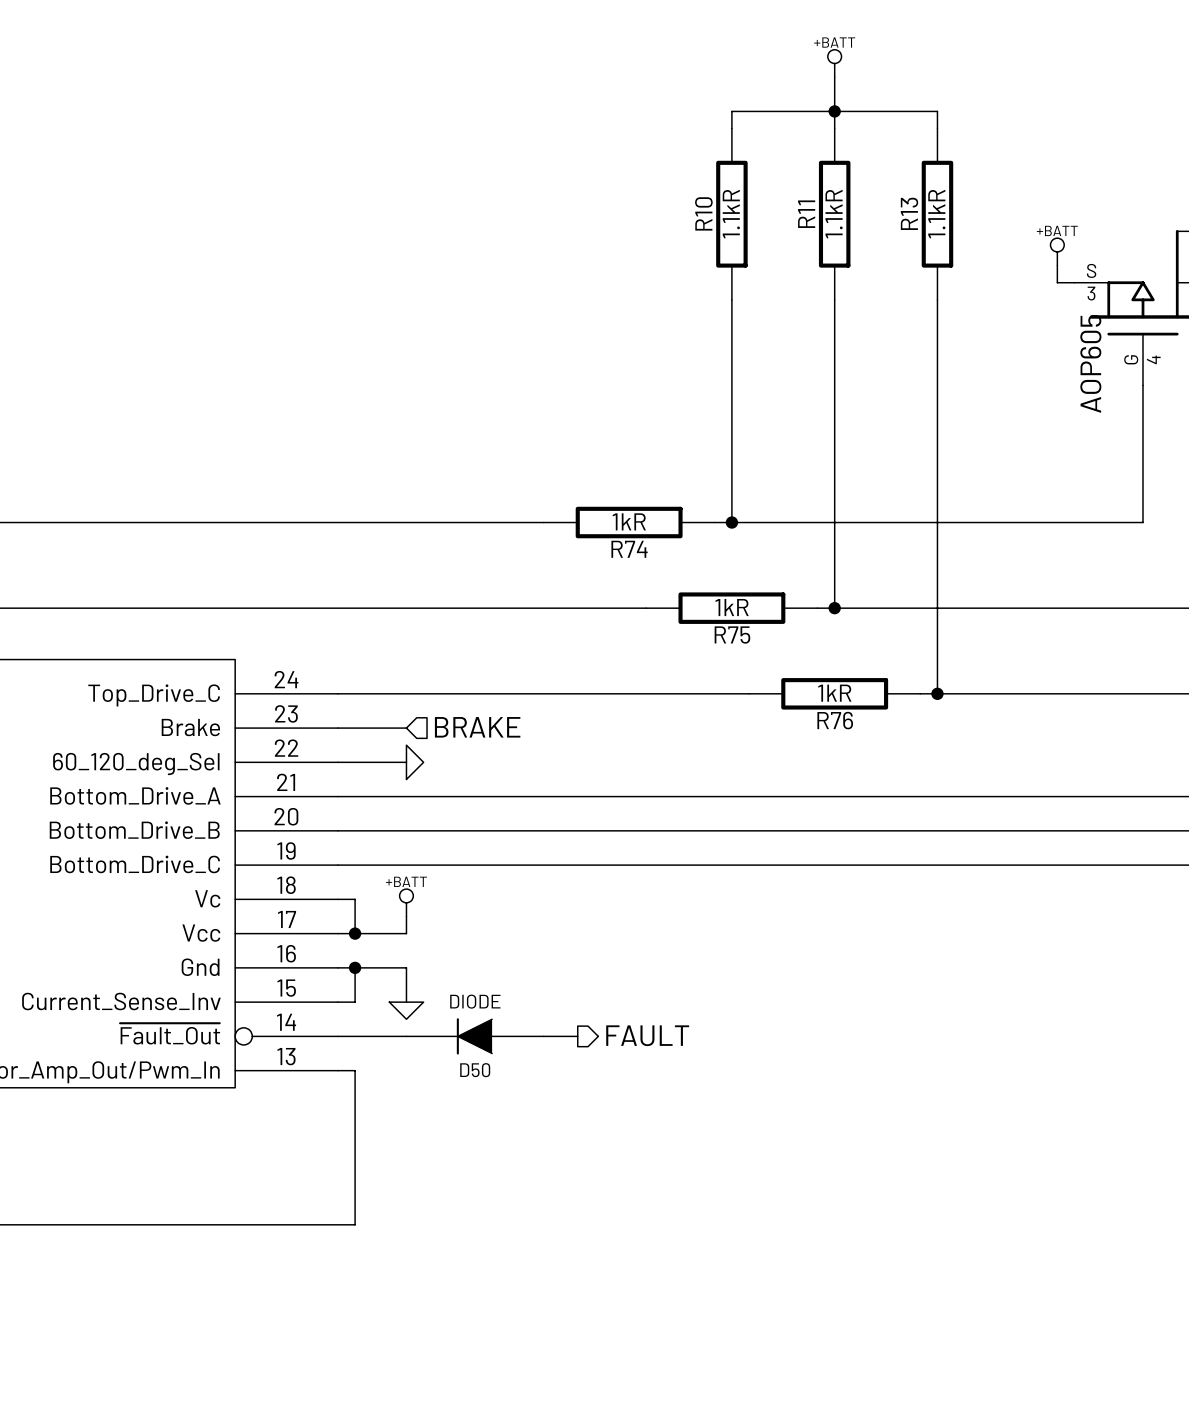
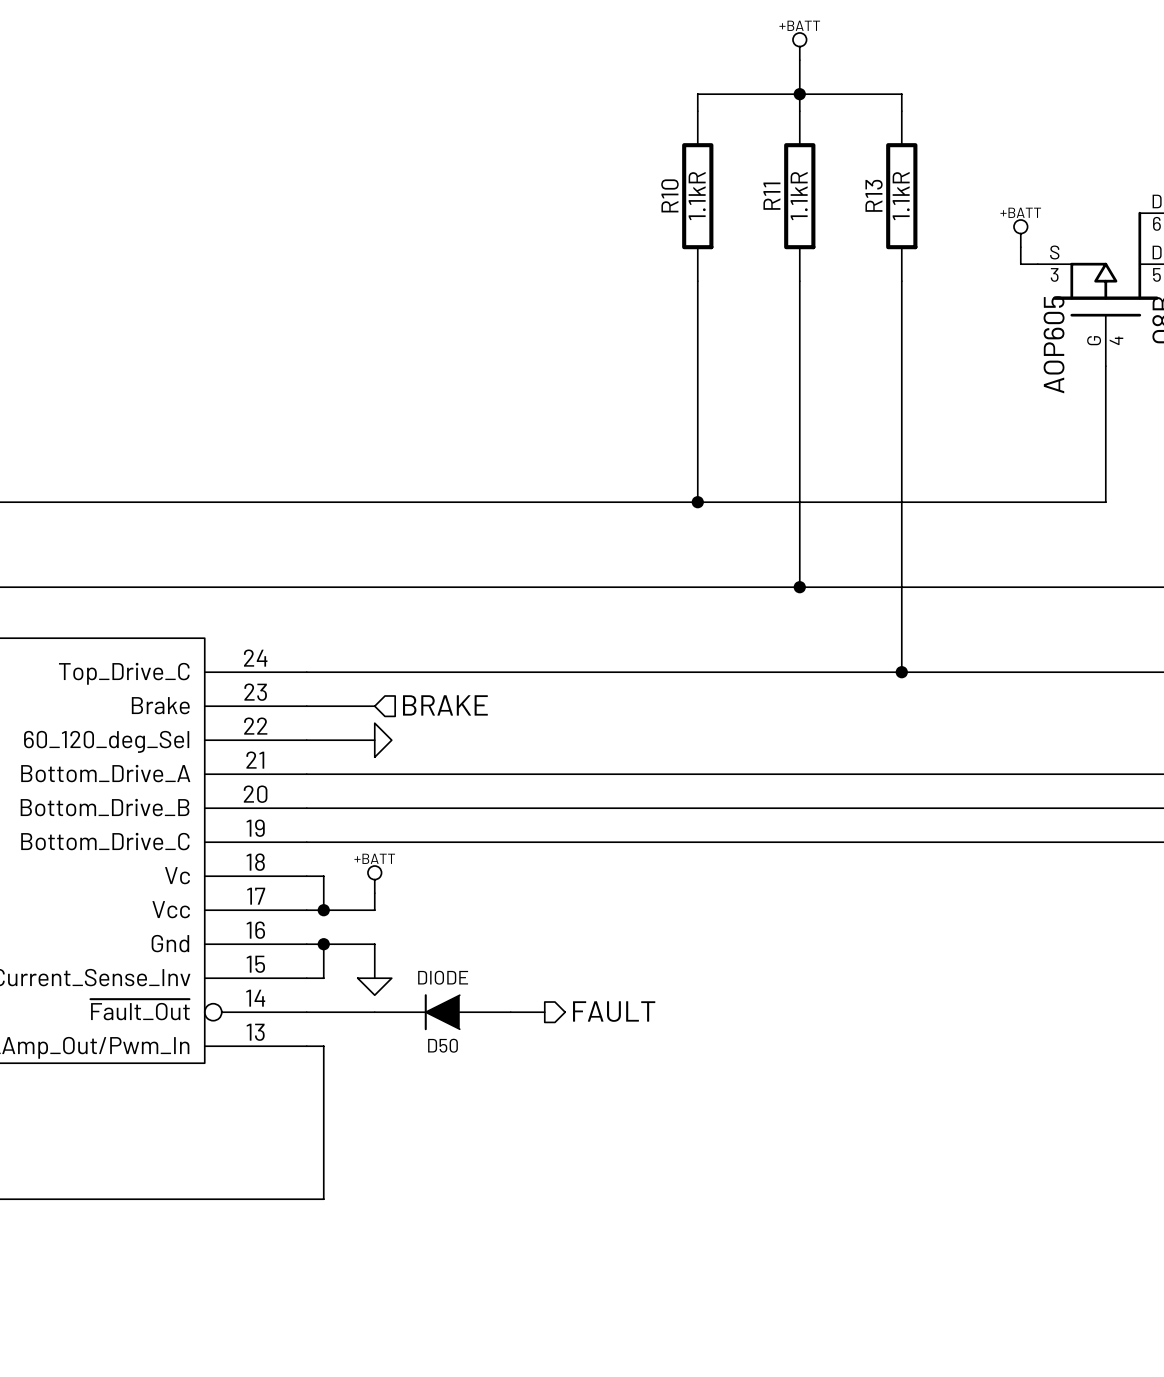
wire: none -> (510, 502) (680, 502)
R74: 1kR (629, 522) -> none
wire: none -> (612, 587) (782, 587)
R75: 1kR (731, 608) -> none
wire: none -> (714, 672) (884, 672)
R76: 1kR (834, 693) -> none

